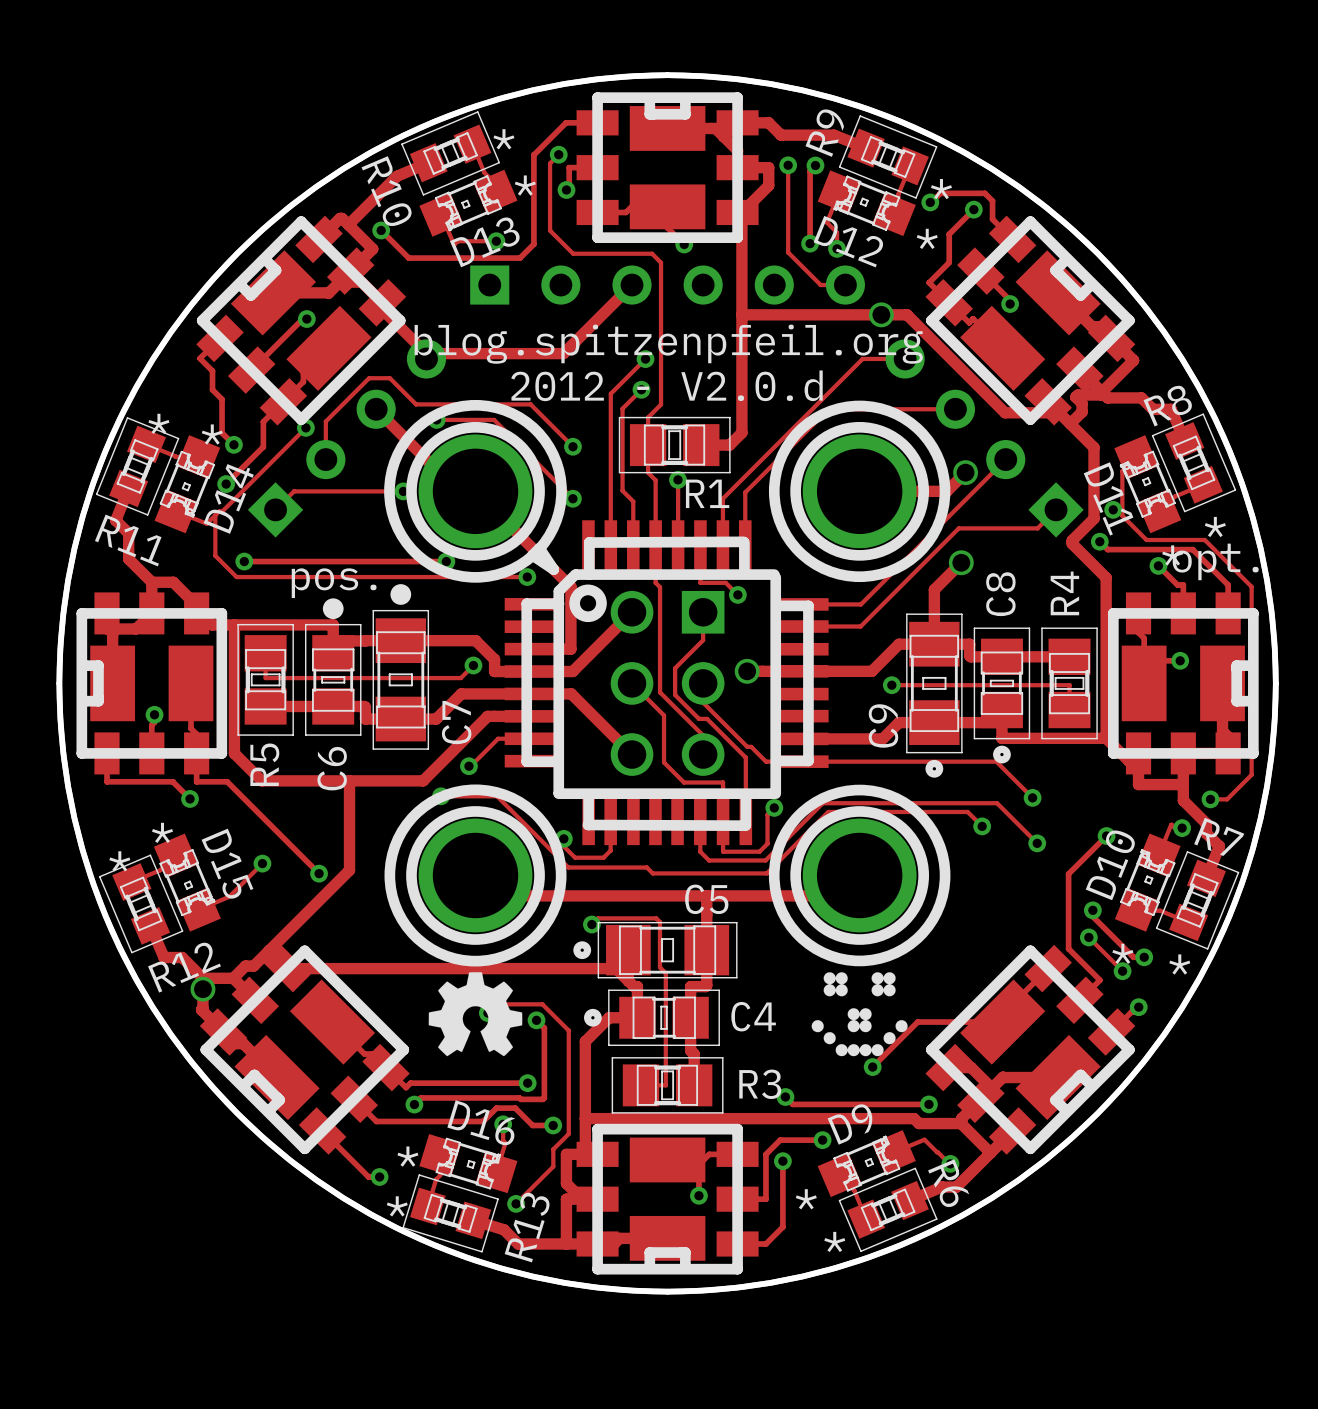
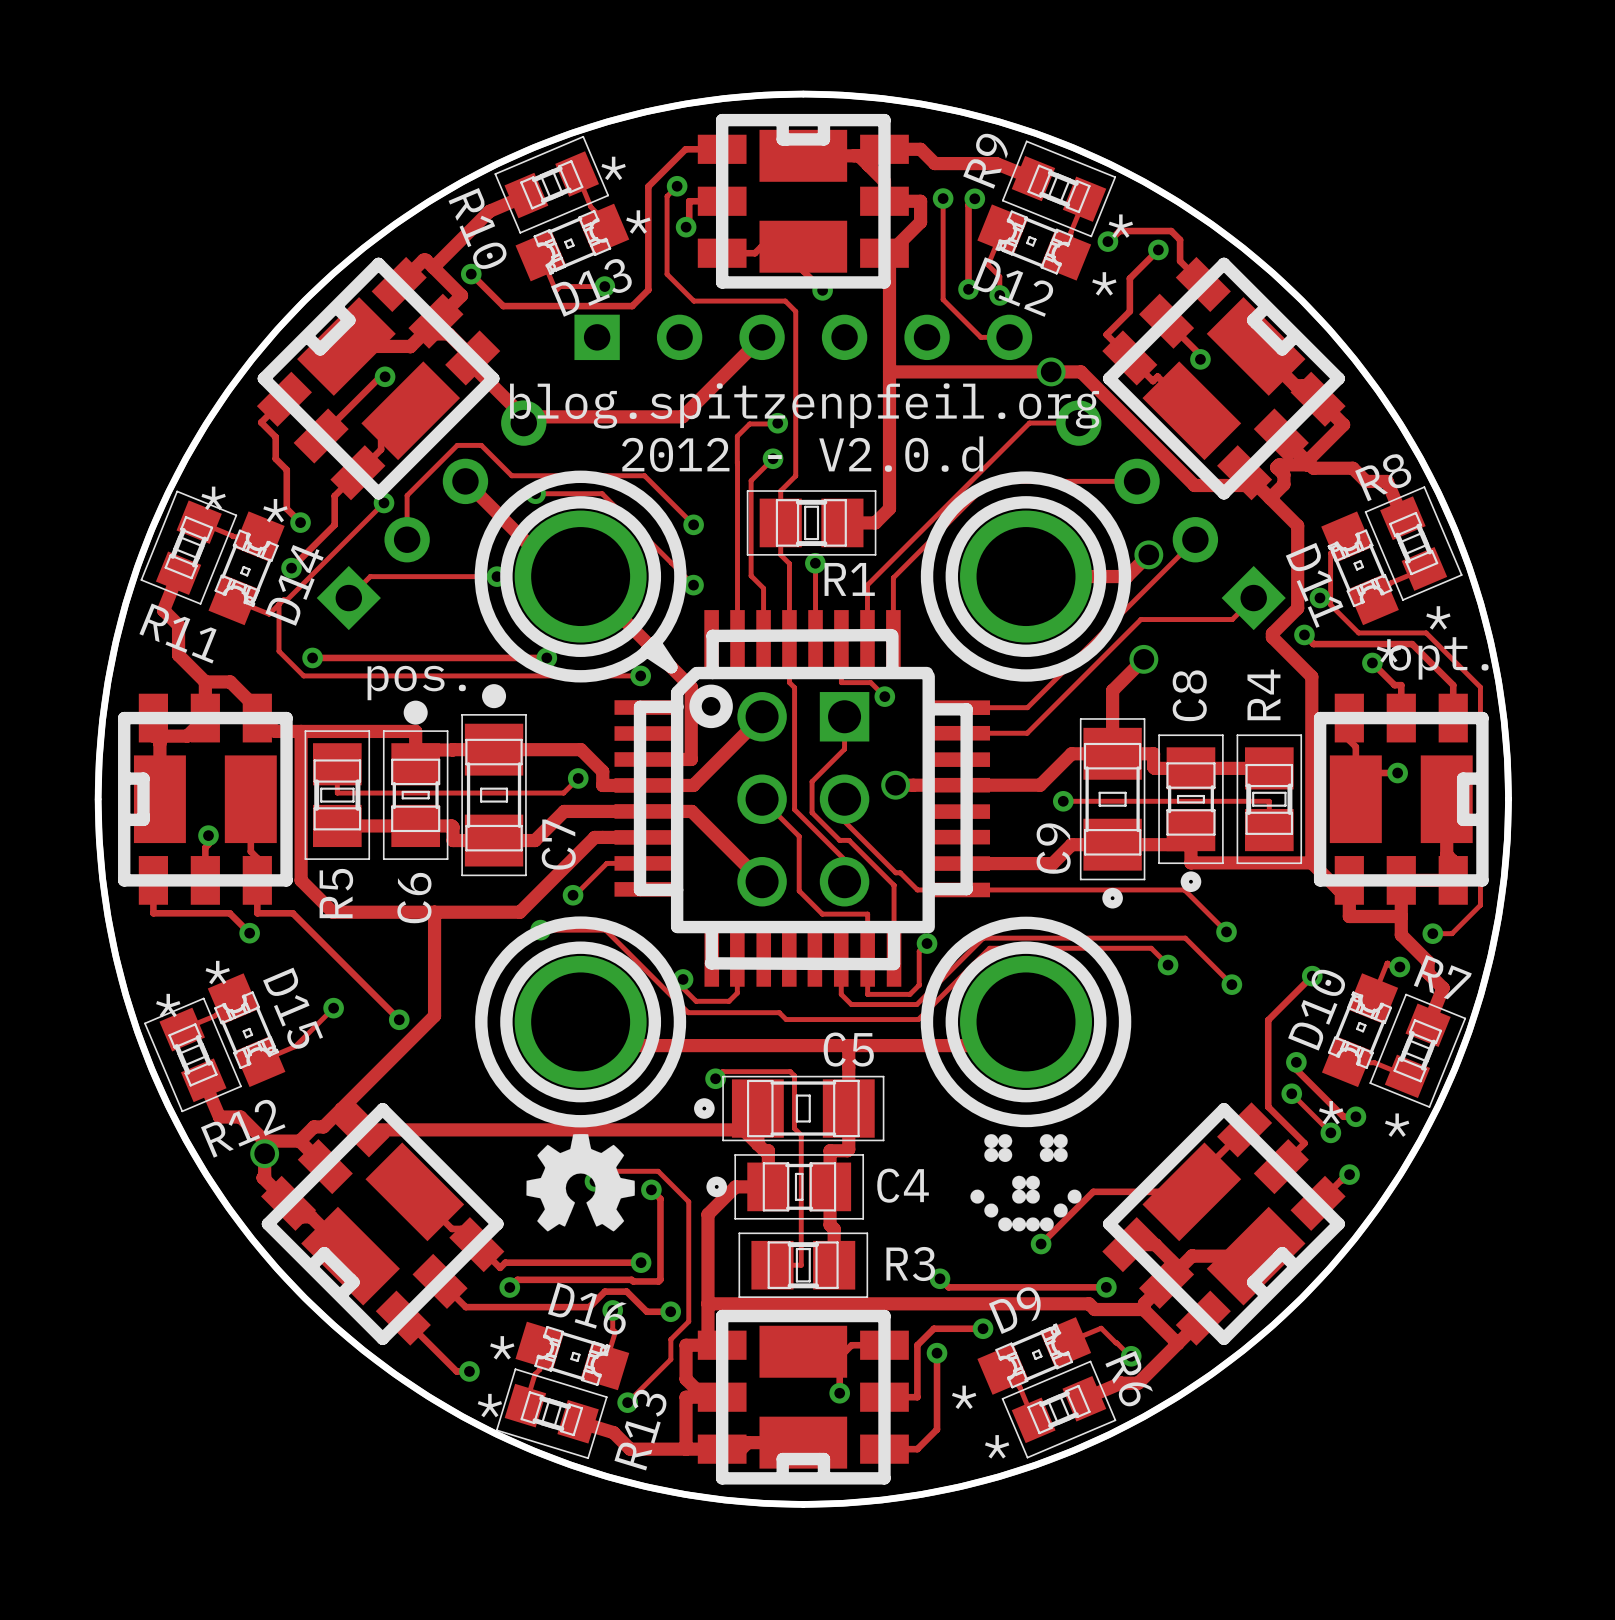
track: (645, 359) (610, 393) -> (778, 423) (749, 423) (737, 436) (737, 463)

